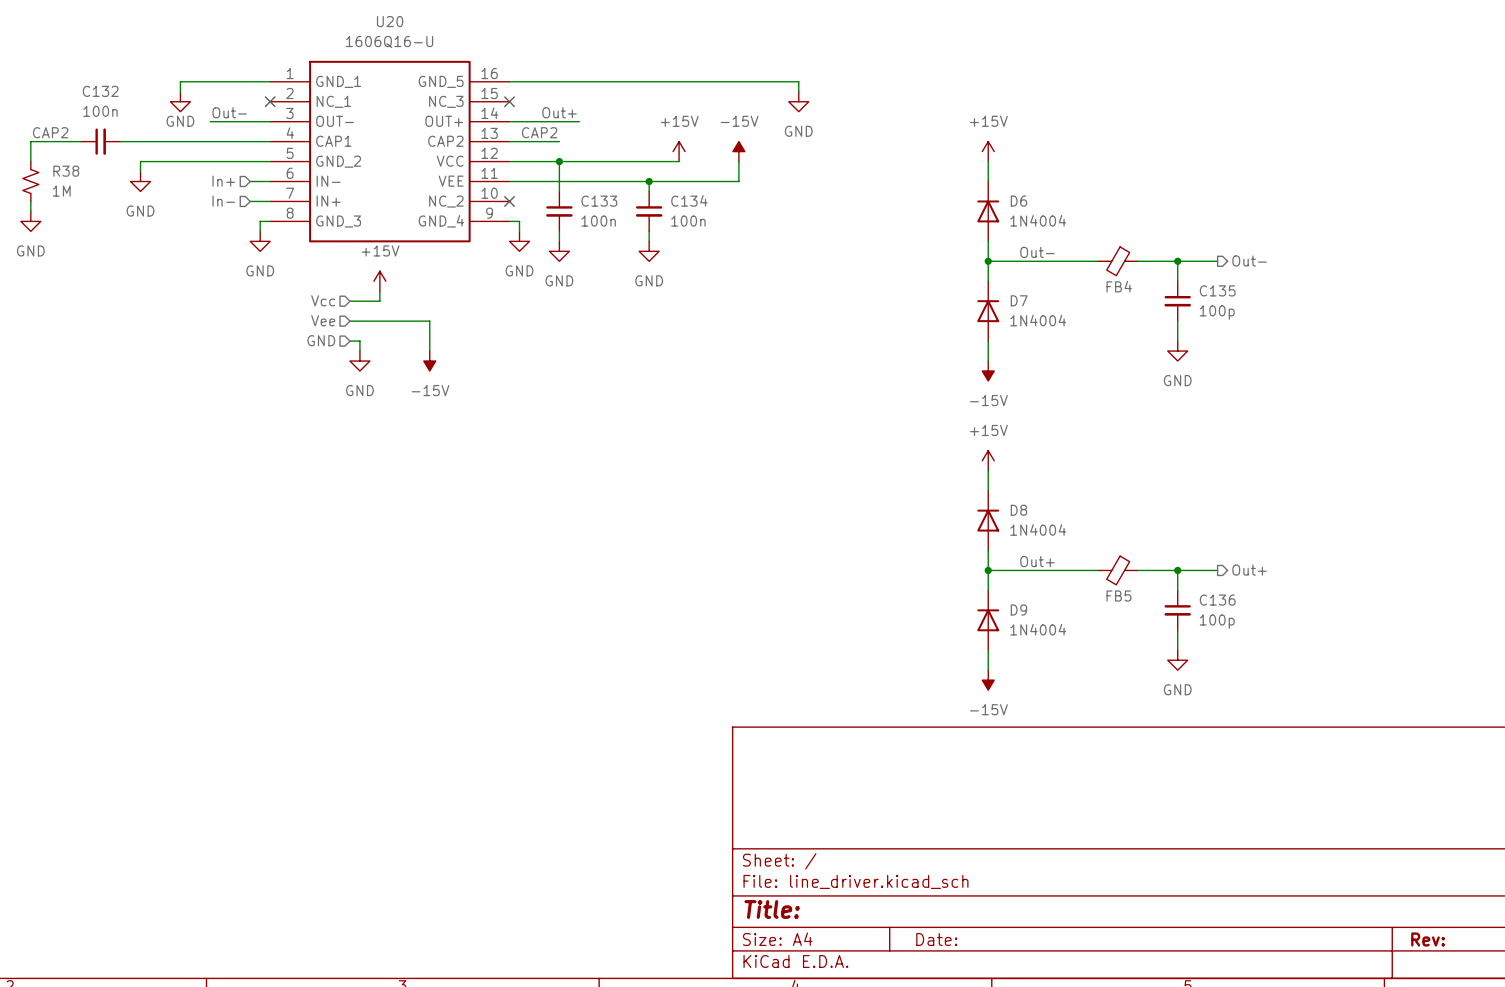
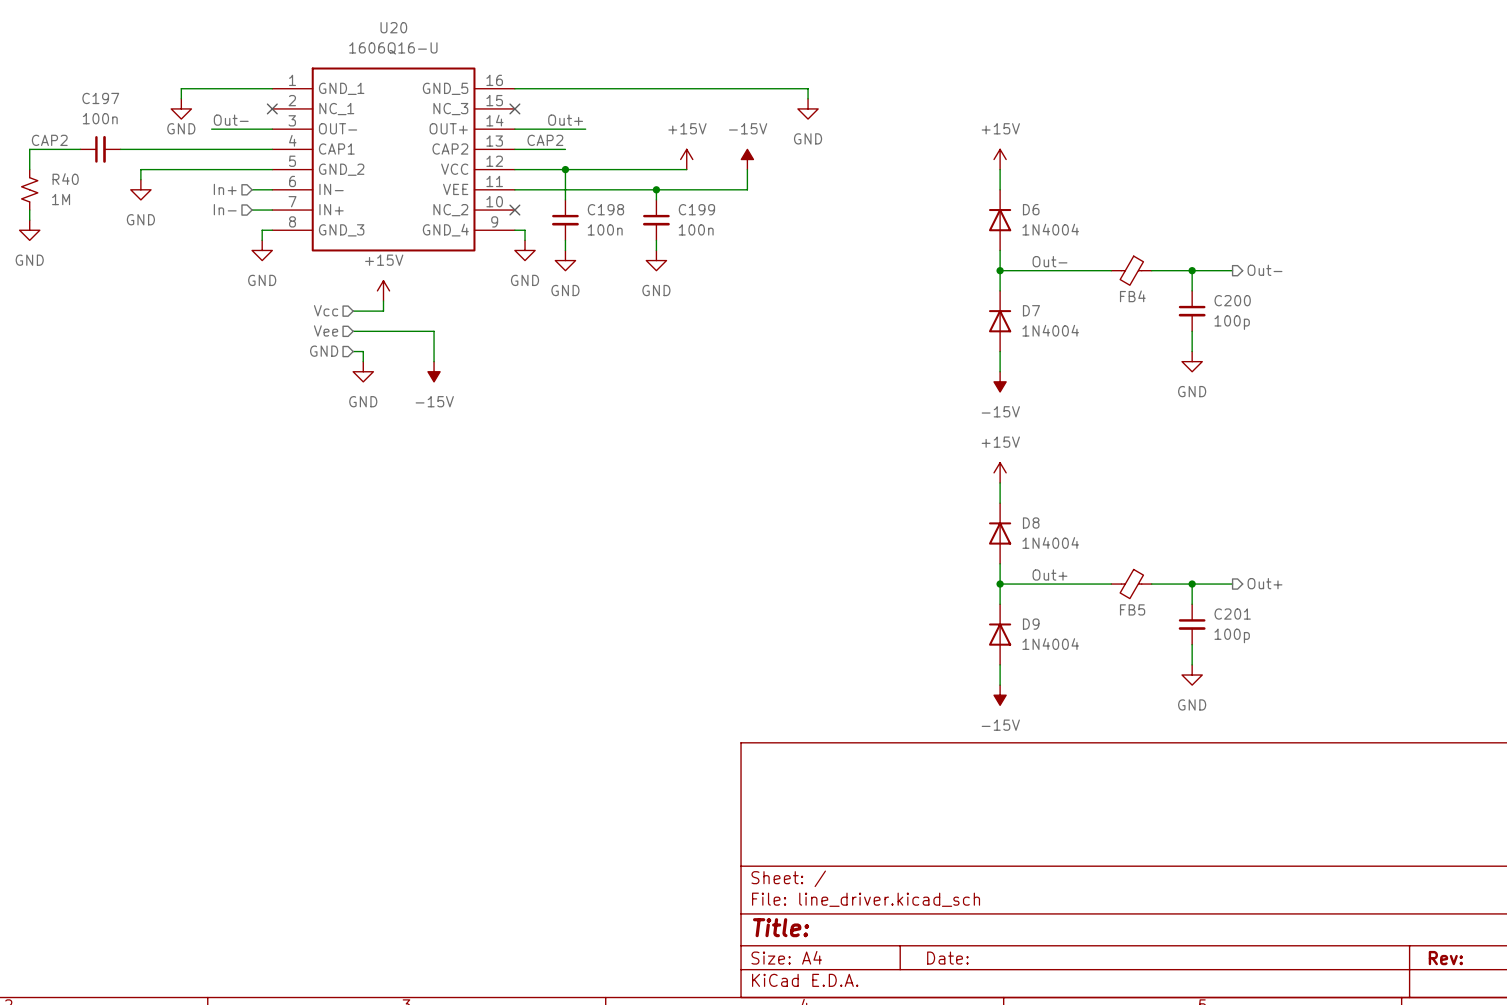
C132 name: C132 (100, 91) -> C197 (100, 98)
R38 name: R38 (66, 171) -> R40 (65, 179)
C134 name: C134 (689, 200) -> C199 (696, 209)
C133 name: C133 (599, 201) -> C198 (605, 209)
C135 name: C135 (1217, 290) -> C200 (1232, 300)
C136 name: C136 (1217, 600) -> C201 (1232, 614)

